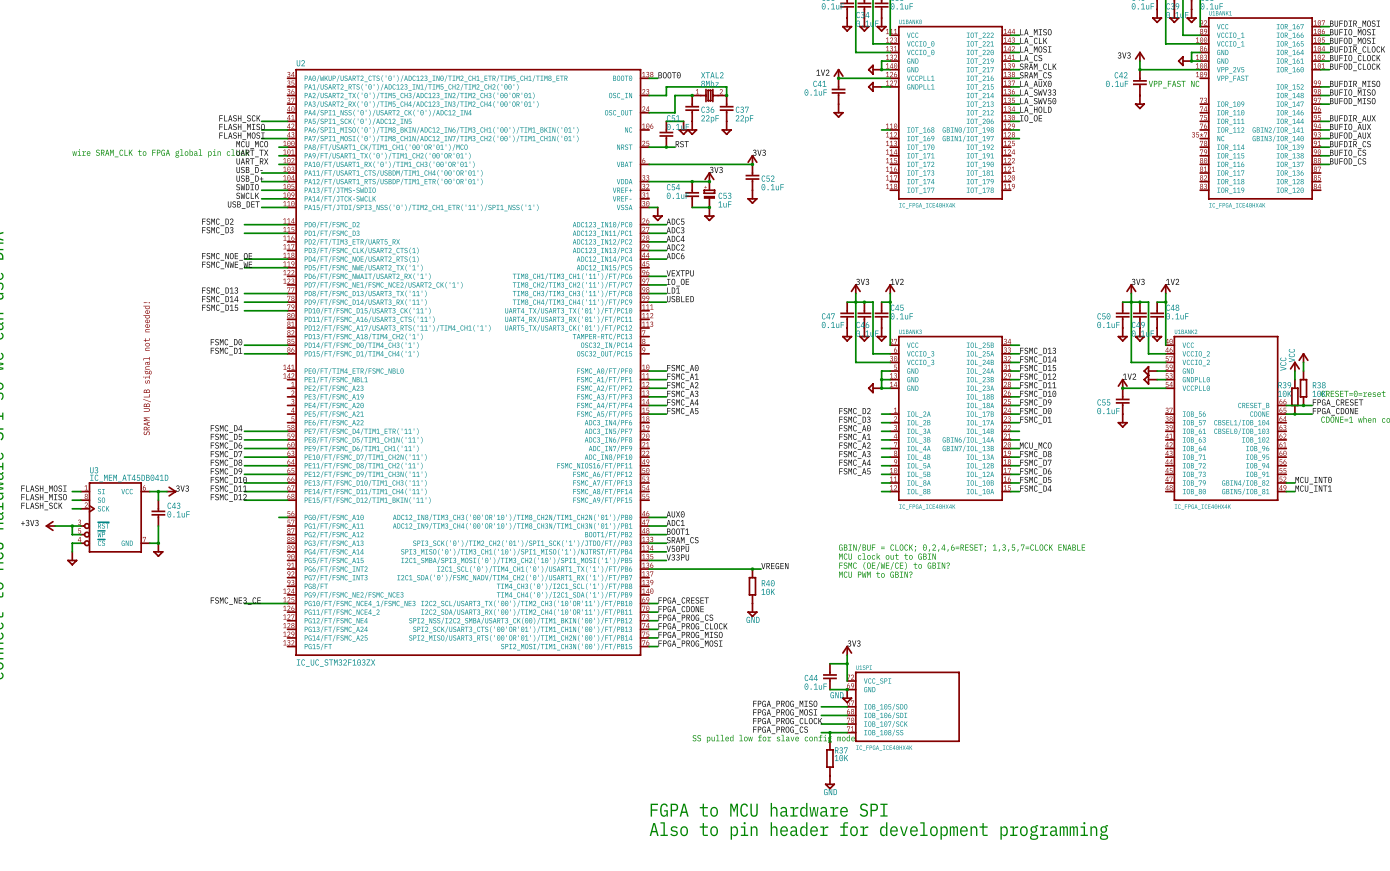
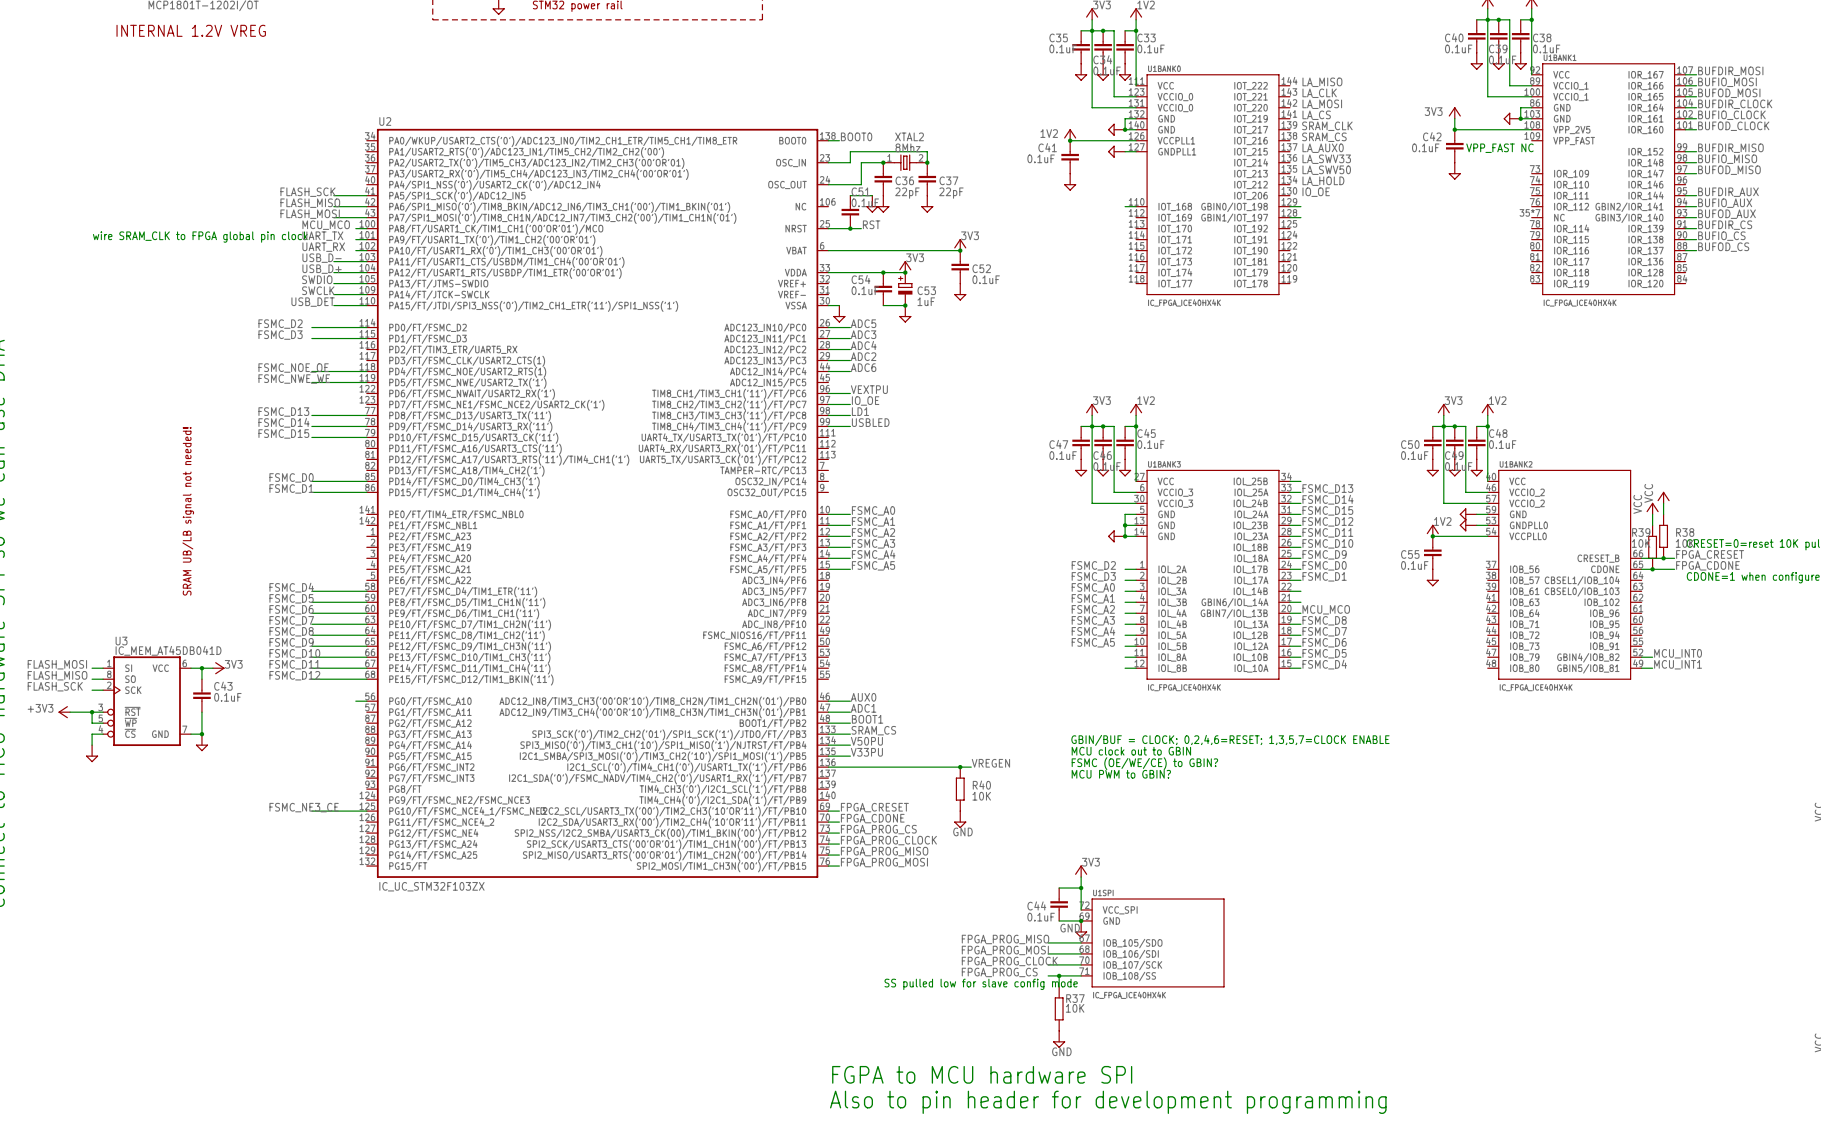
wire: (1010, 35) (1019, 35) -> none
wire: (1010, 43) (1019, 43) -> none
wire: (1010, 52) (1019, 52) -> none
wire: (1010, 61) (1019, 61) -> none
wire: (1010, 69) (1019, 69) -> none
wire: (1010, 78) (1019, 78) -> none
wire: (1010, 86) (1019, 86) -> none
wire: (1010, 95) (1019, 95) -> none
wire: (1010, 104) (1019, 104) -> none
wire: (1010, 112) (1019, 112) -> none
wire: (1010, 121) (1019, 121) -> none

